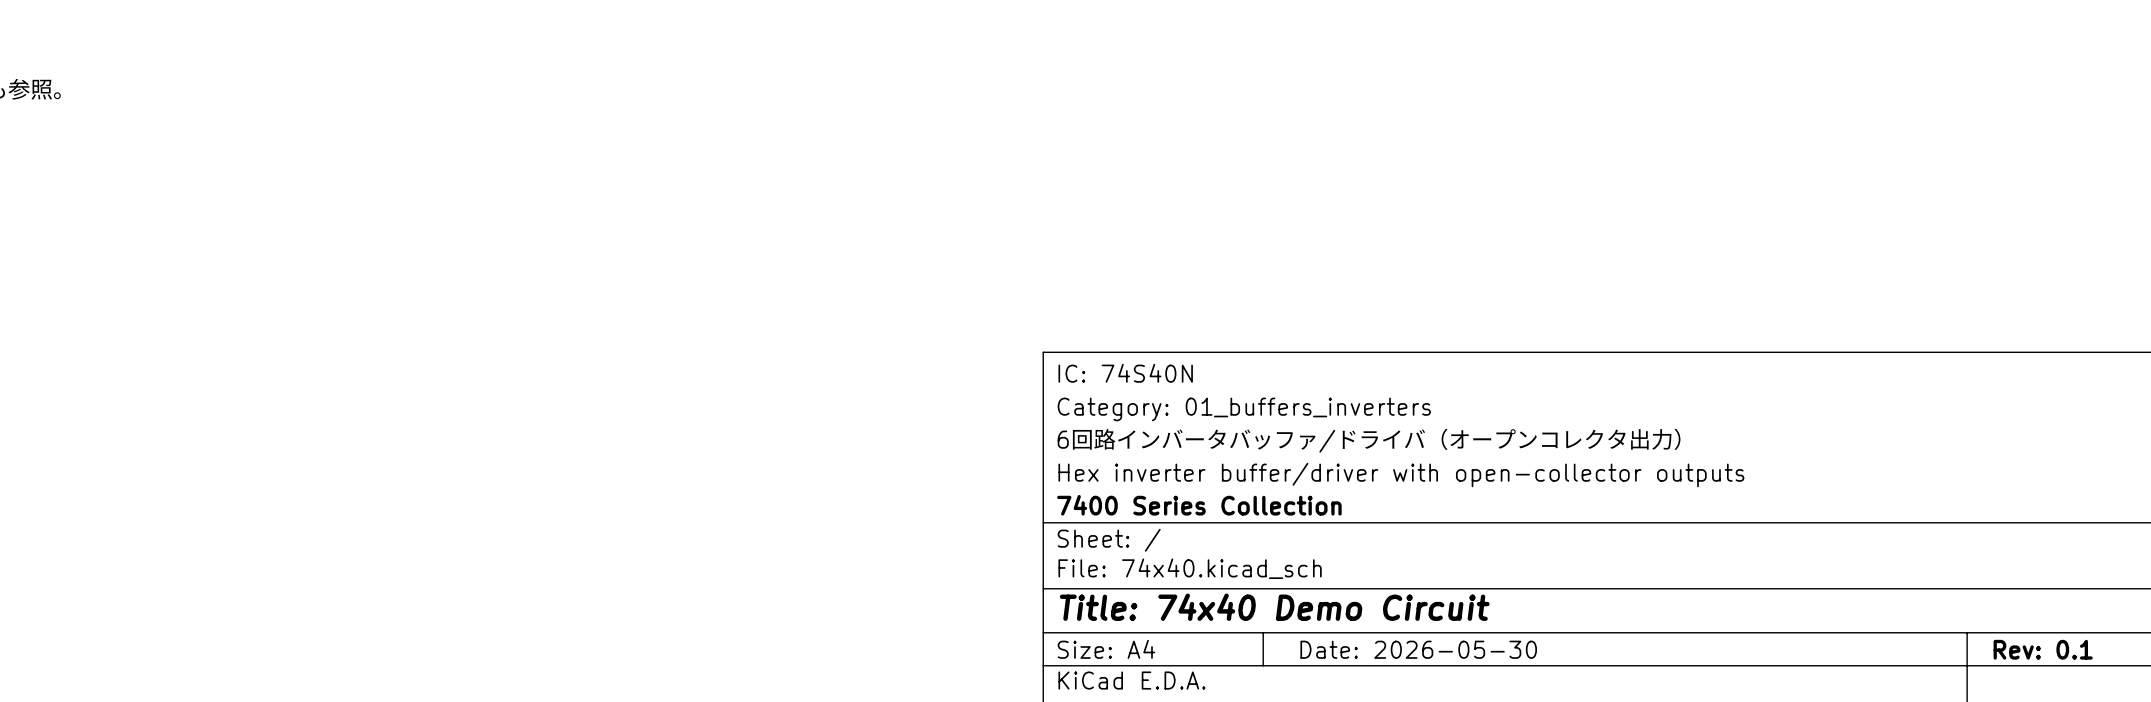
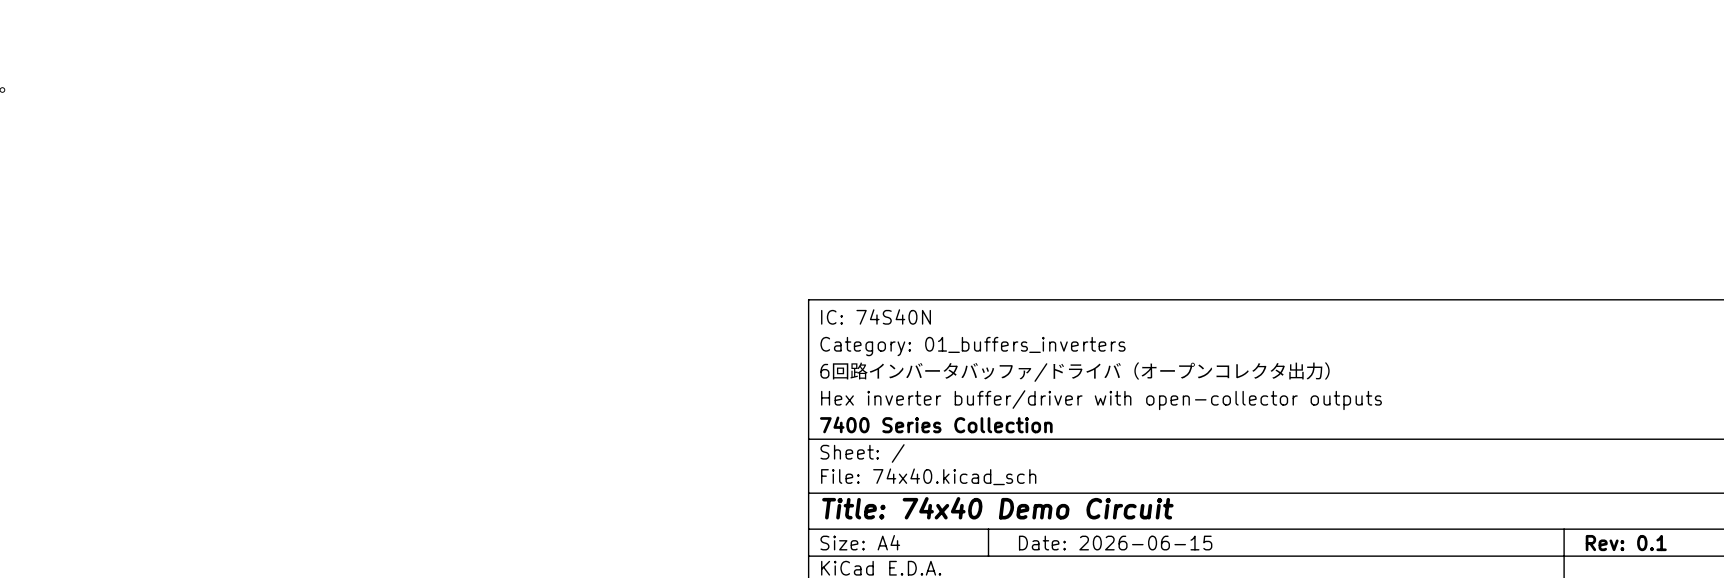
title block: Date: 2026-05-30 (1418, 649) -> Date: 2026-06-15 (1115, 543)

